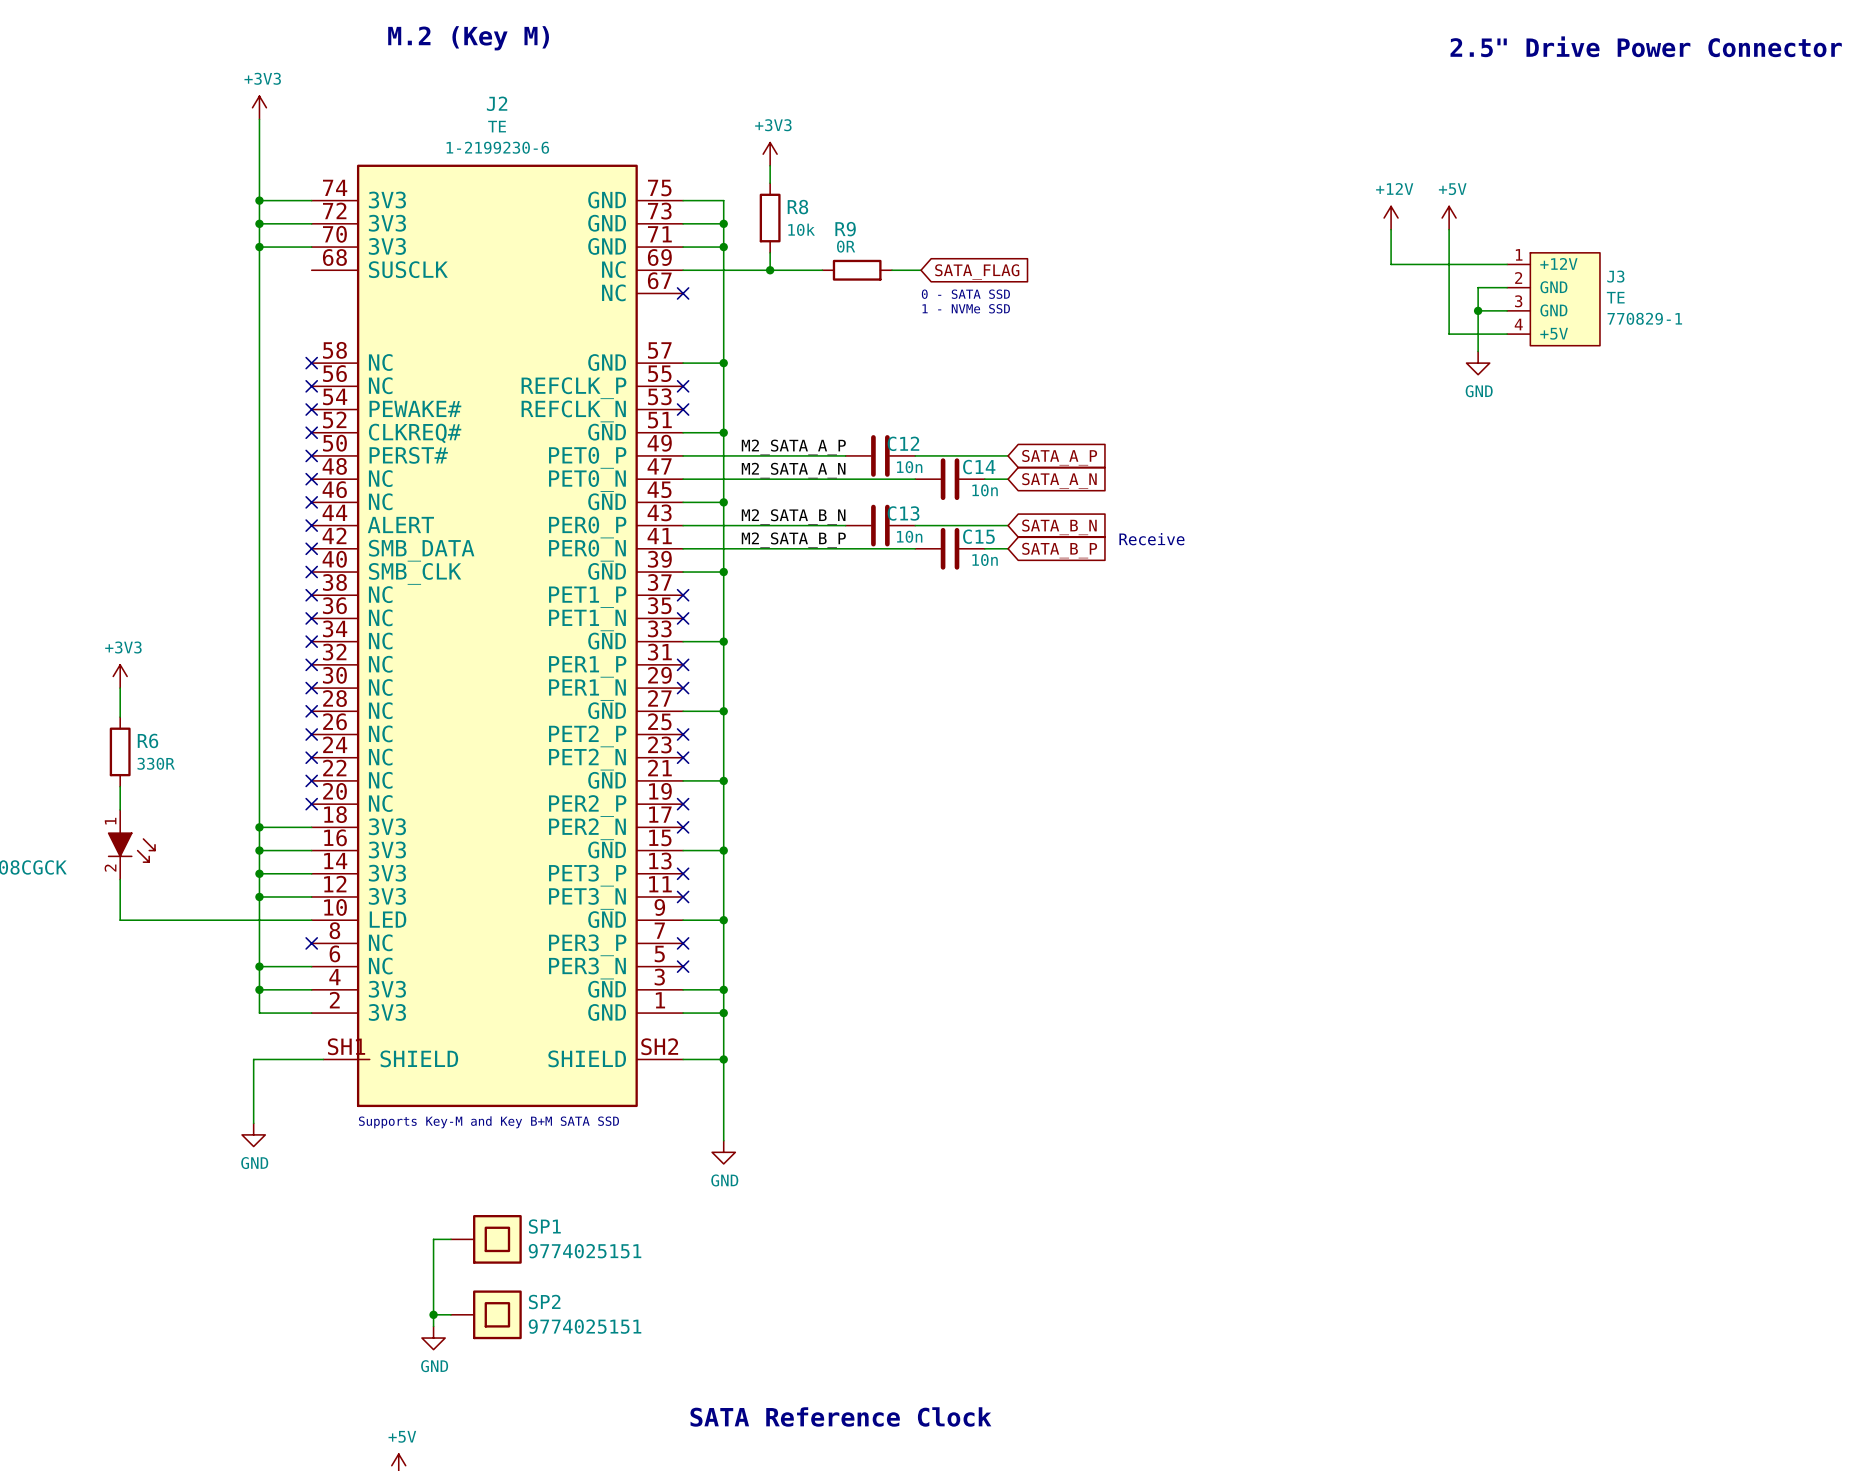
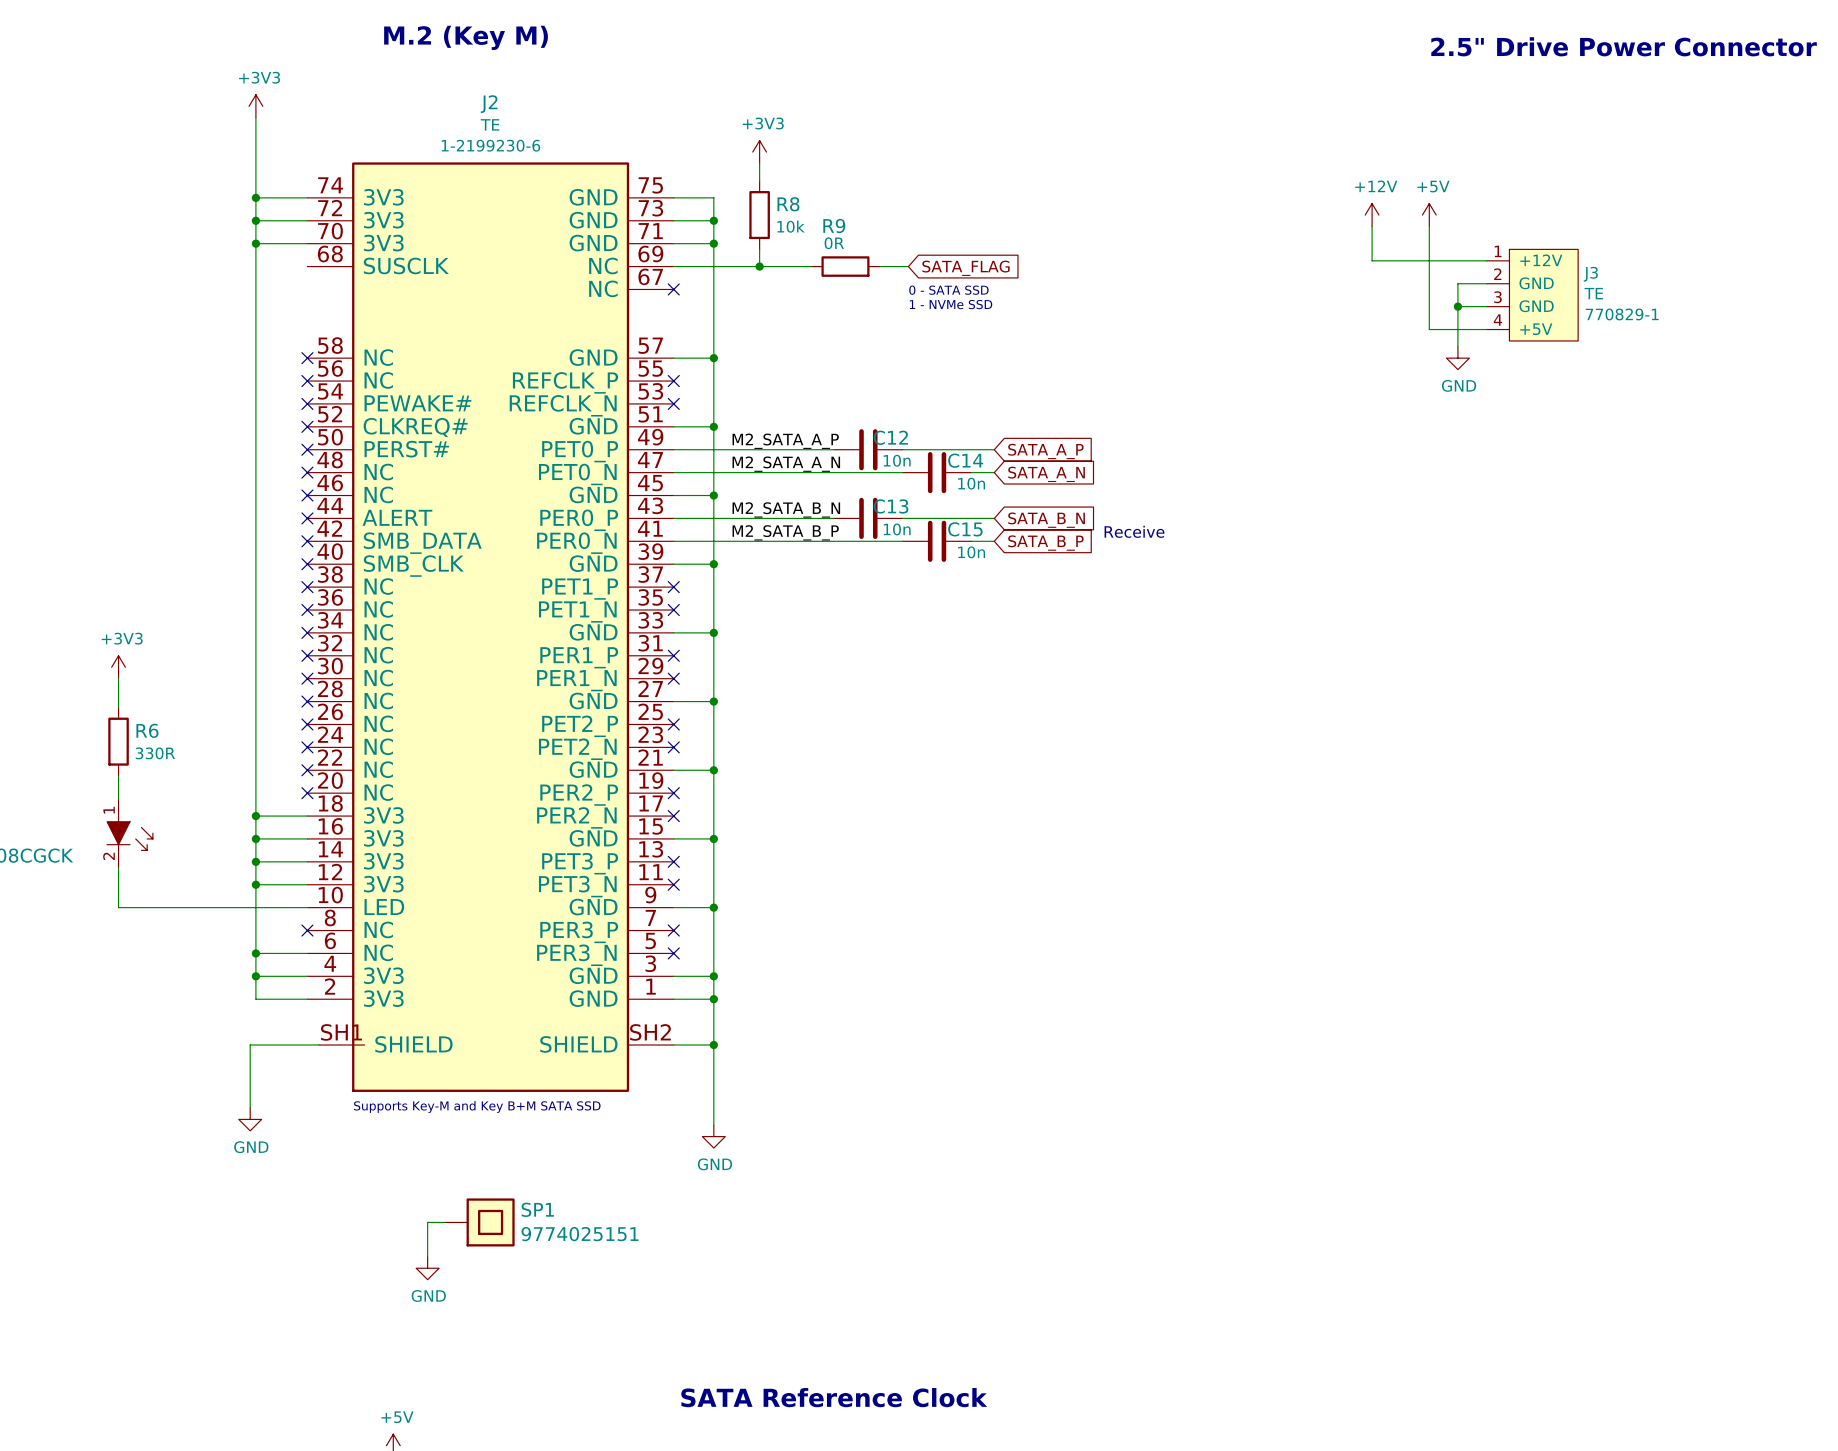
wire: (433, 1274) (433, 1326) -> none
wire: (433, 1314) (450, 1314) -> none
junction: (433, 1314) -> none
SP2: 9774025151 (486, 1314) -> none
power symbol position: GND (433, 1338) -> GND (427, 1268)

